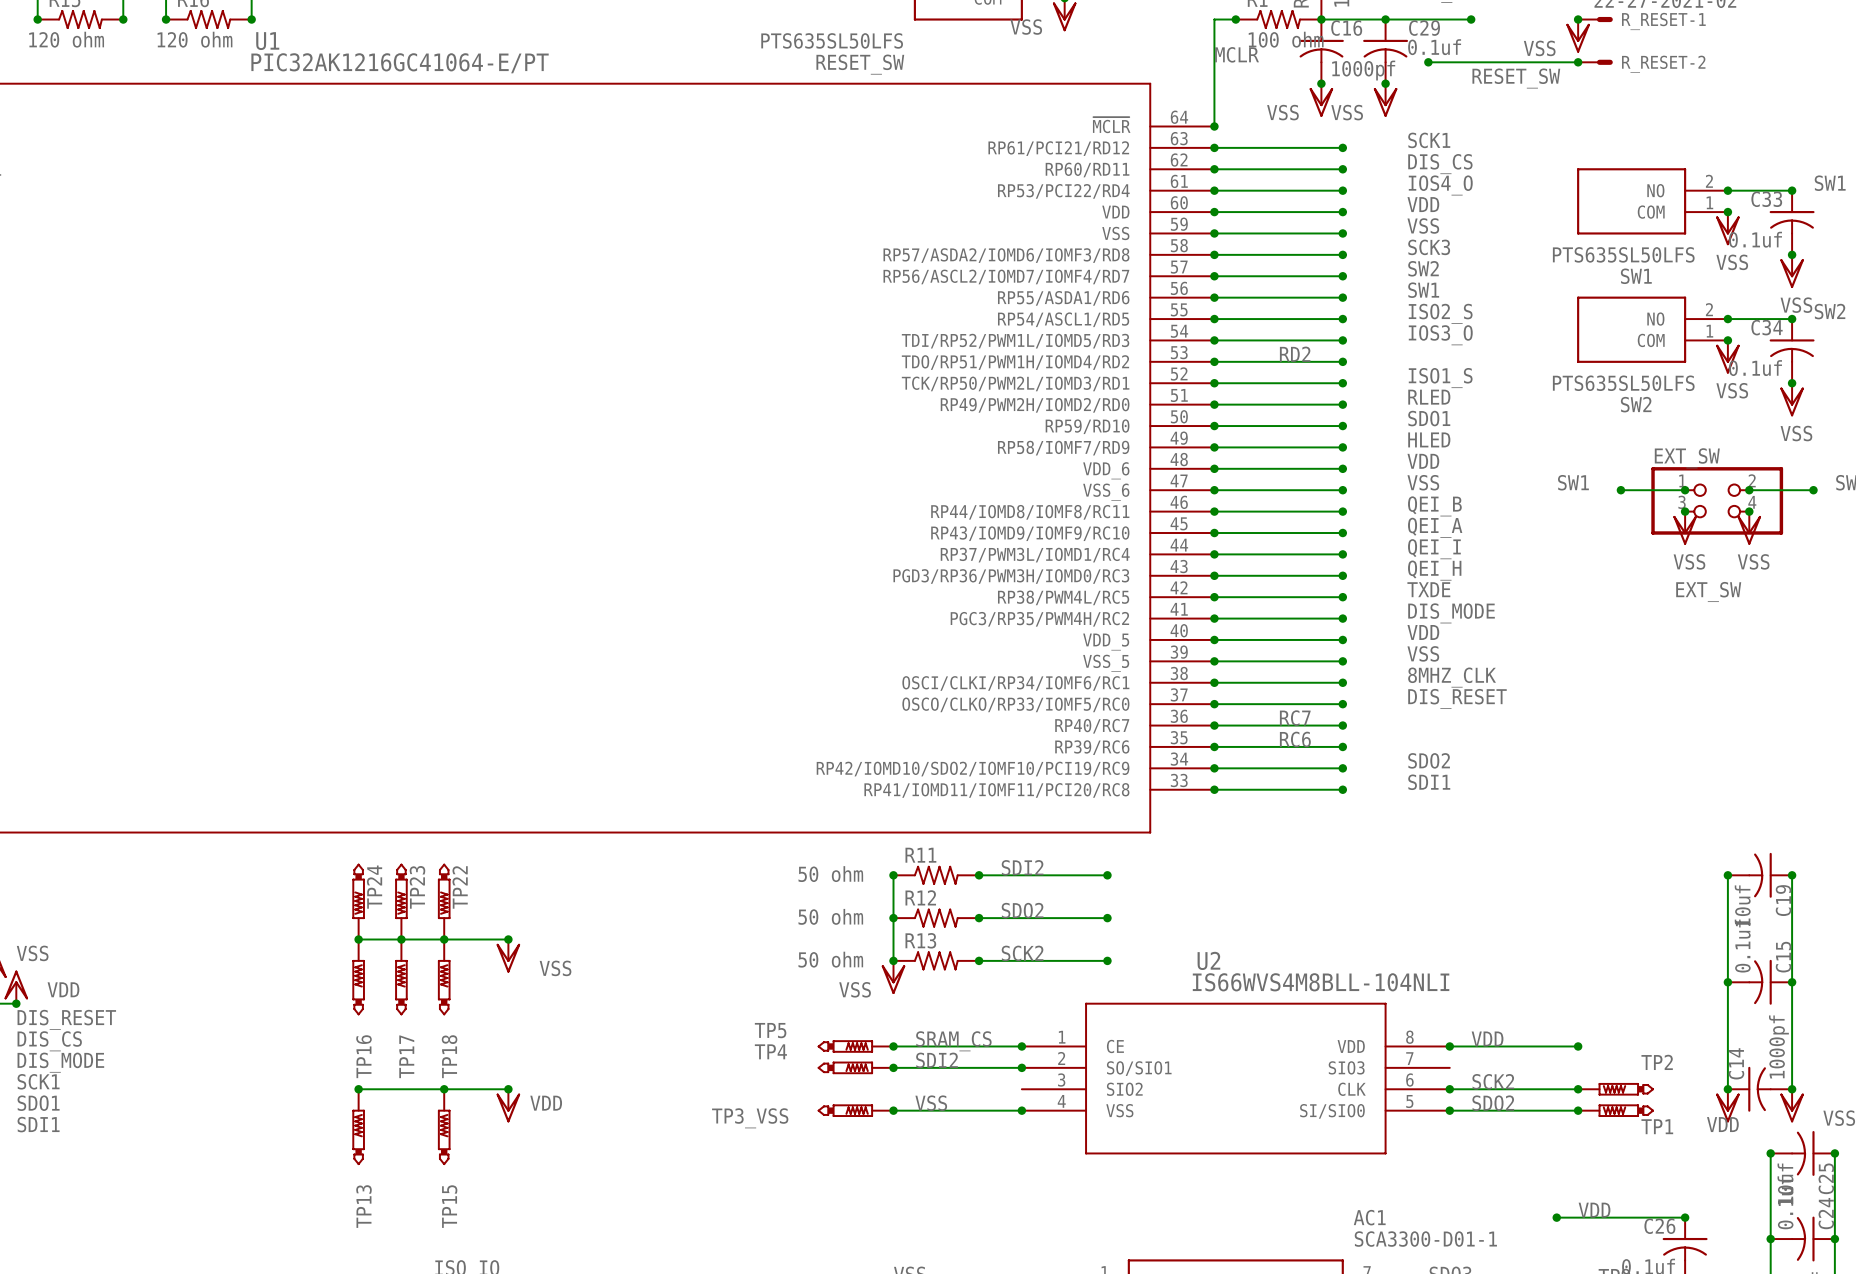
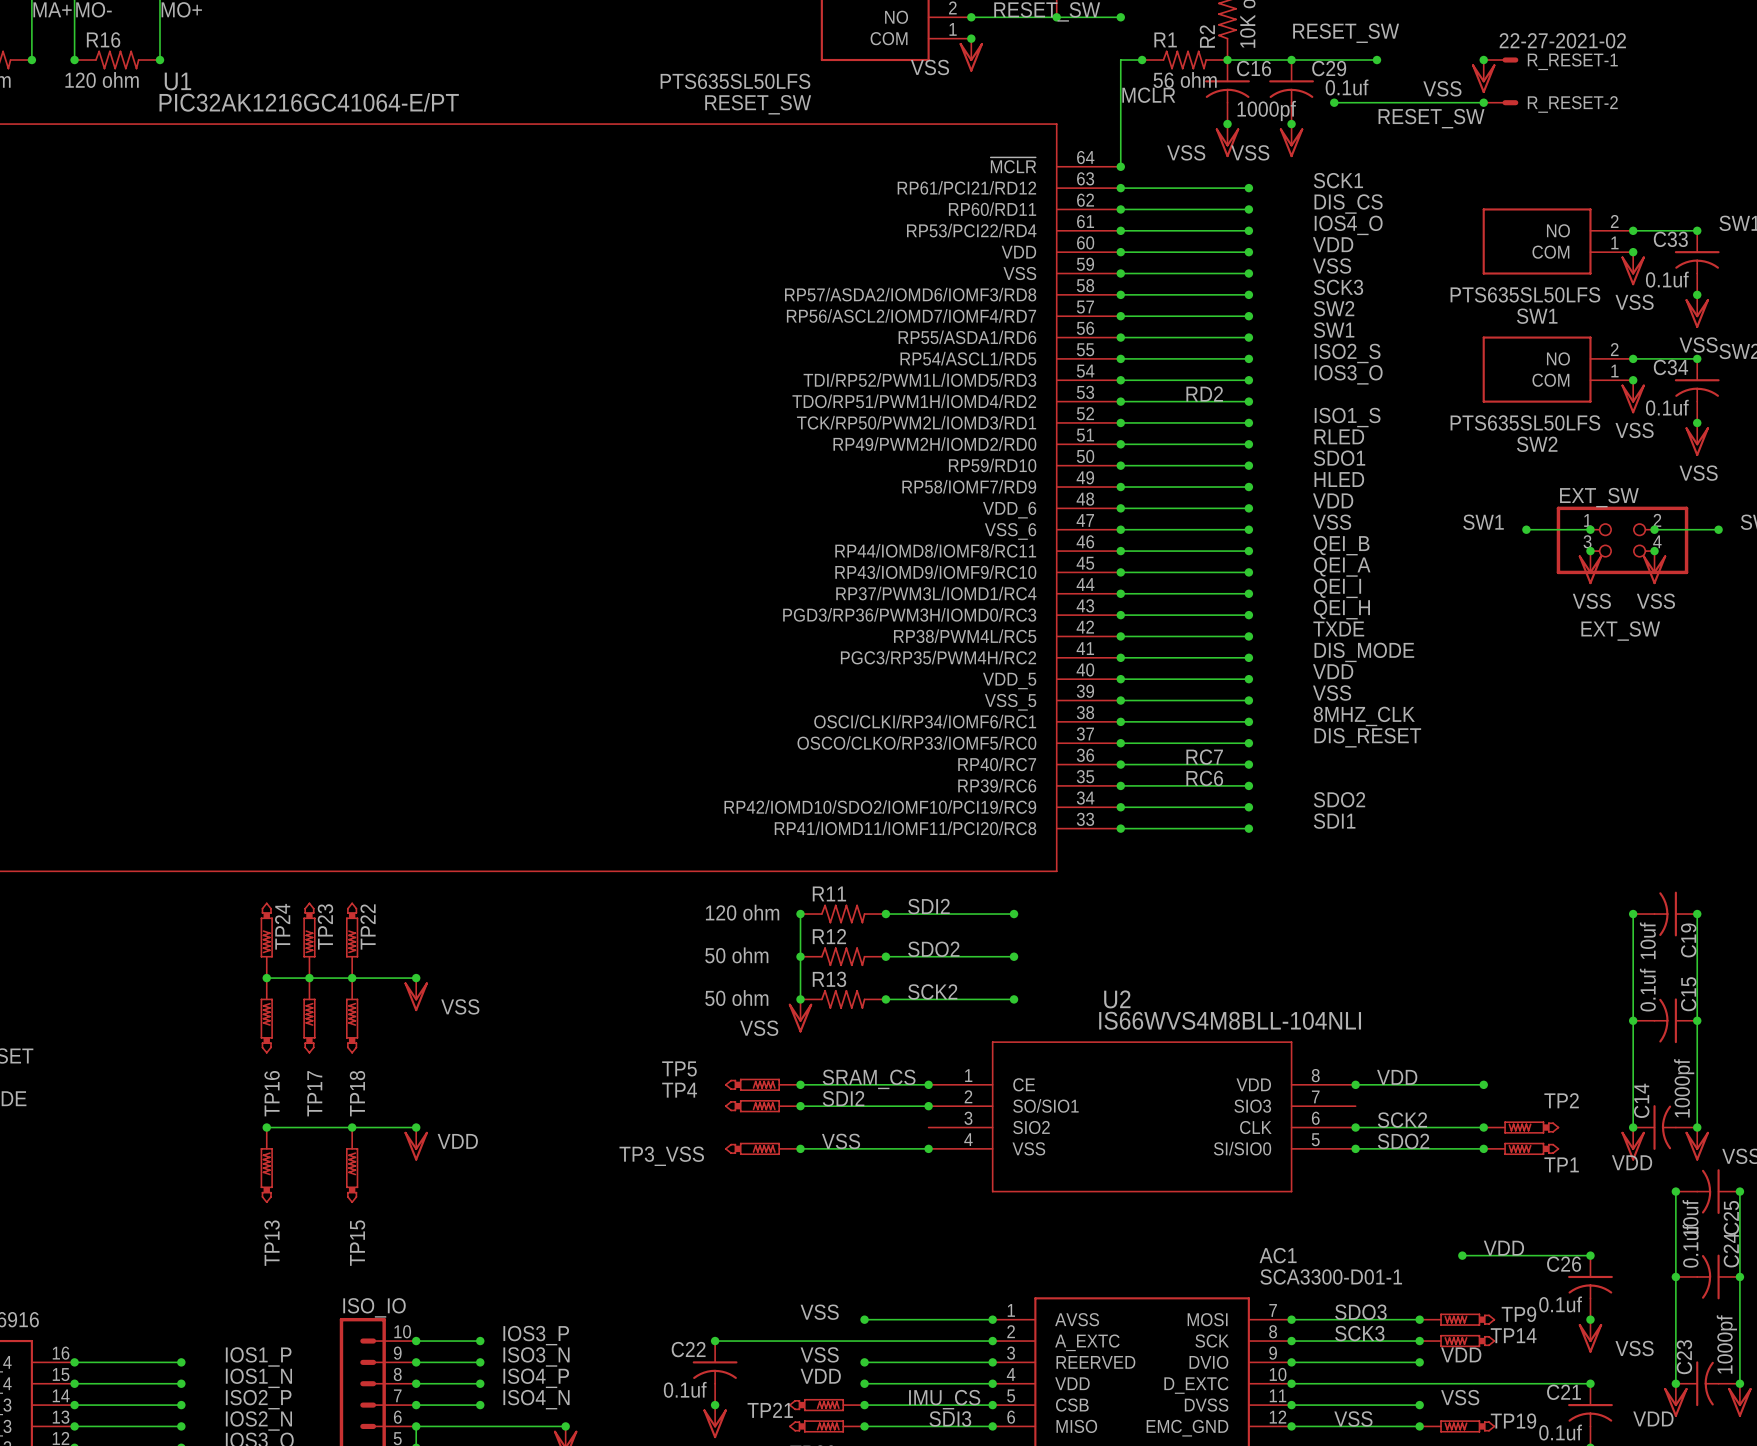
R1 value: 100 ohm (1286, 39) -> 56 ohm (1185, 79)
R11 value: 50 ohm (830, 874) -> 120 ohm (742, 912)

